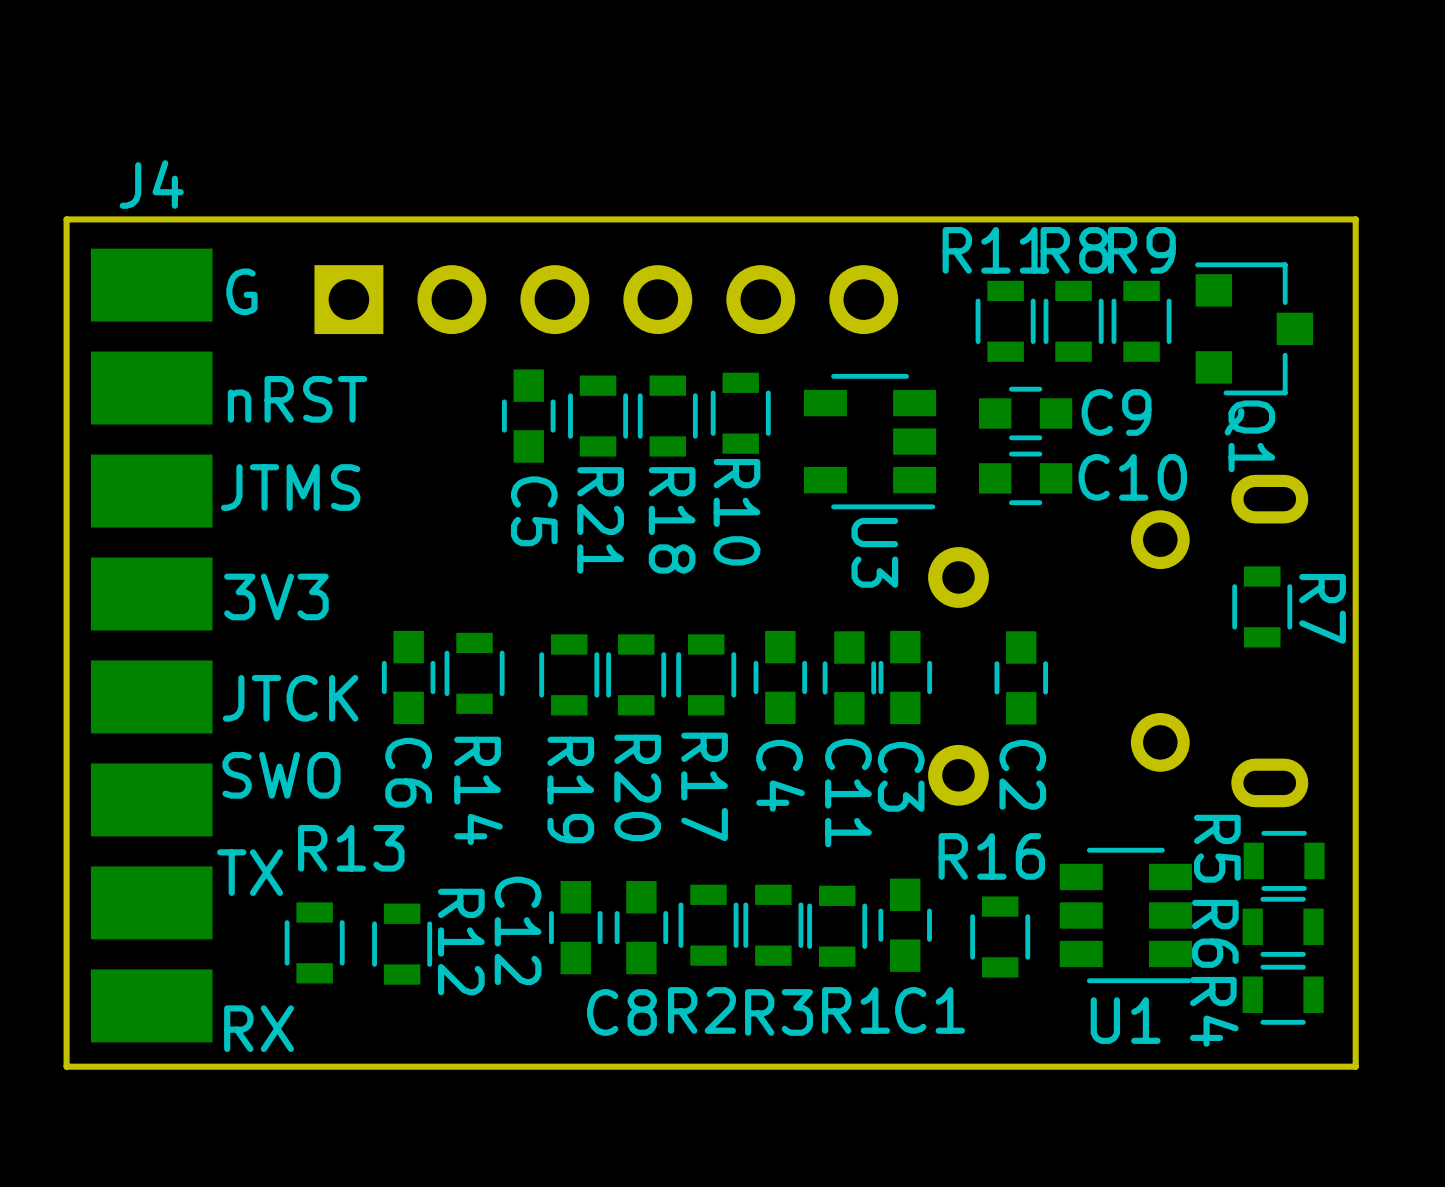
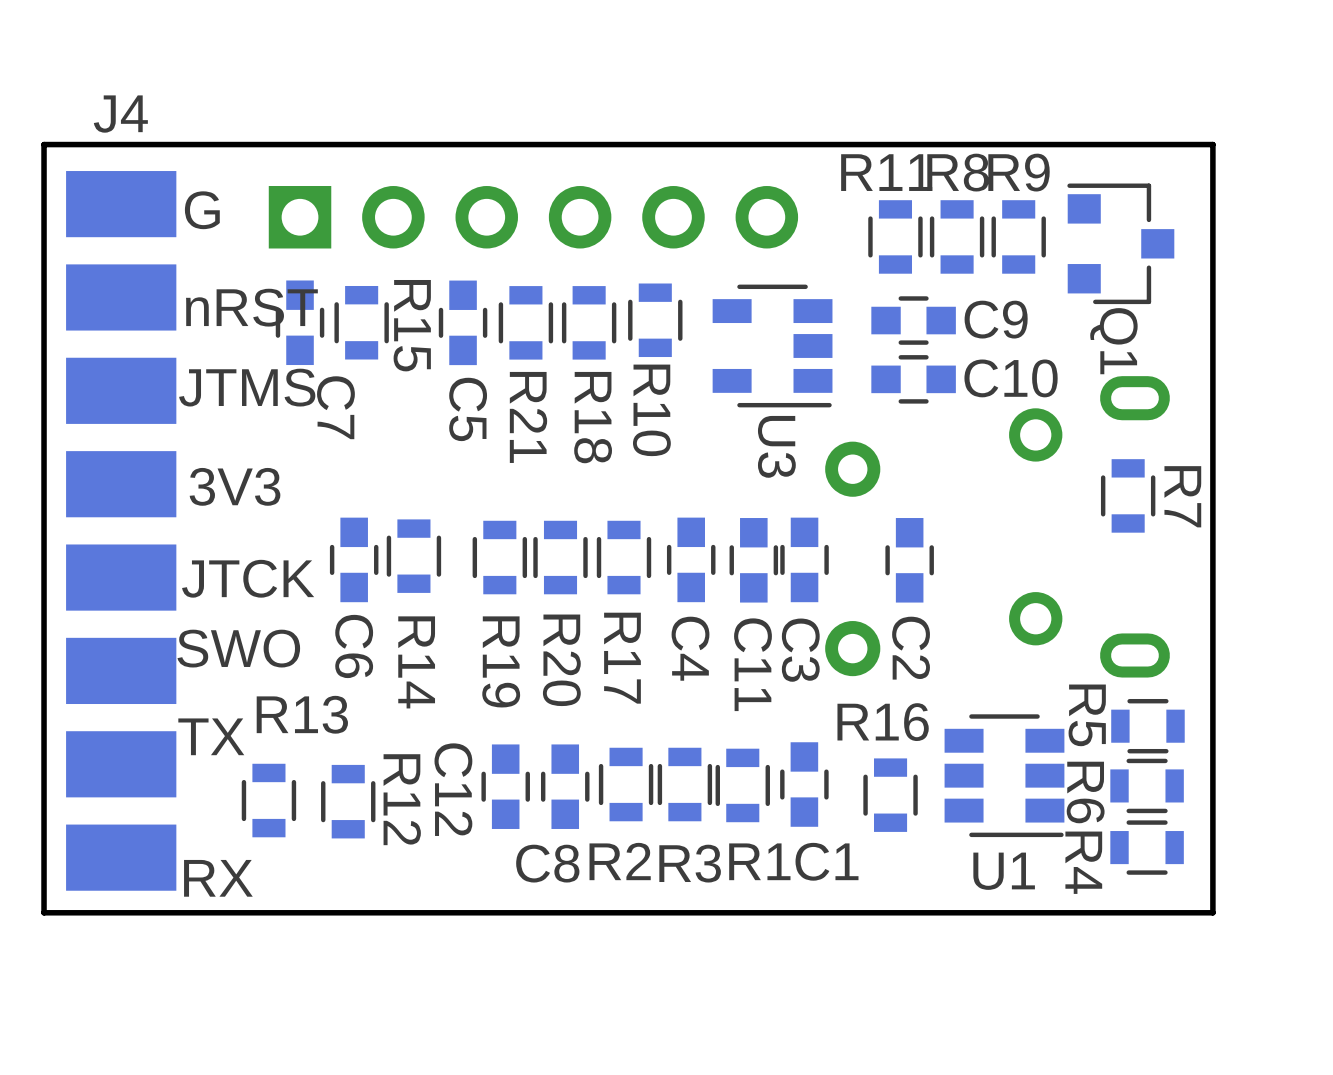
C7: none -> (300, 322)
R15: none -> (361, 322)

